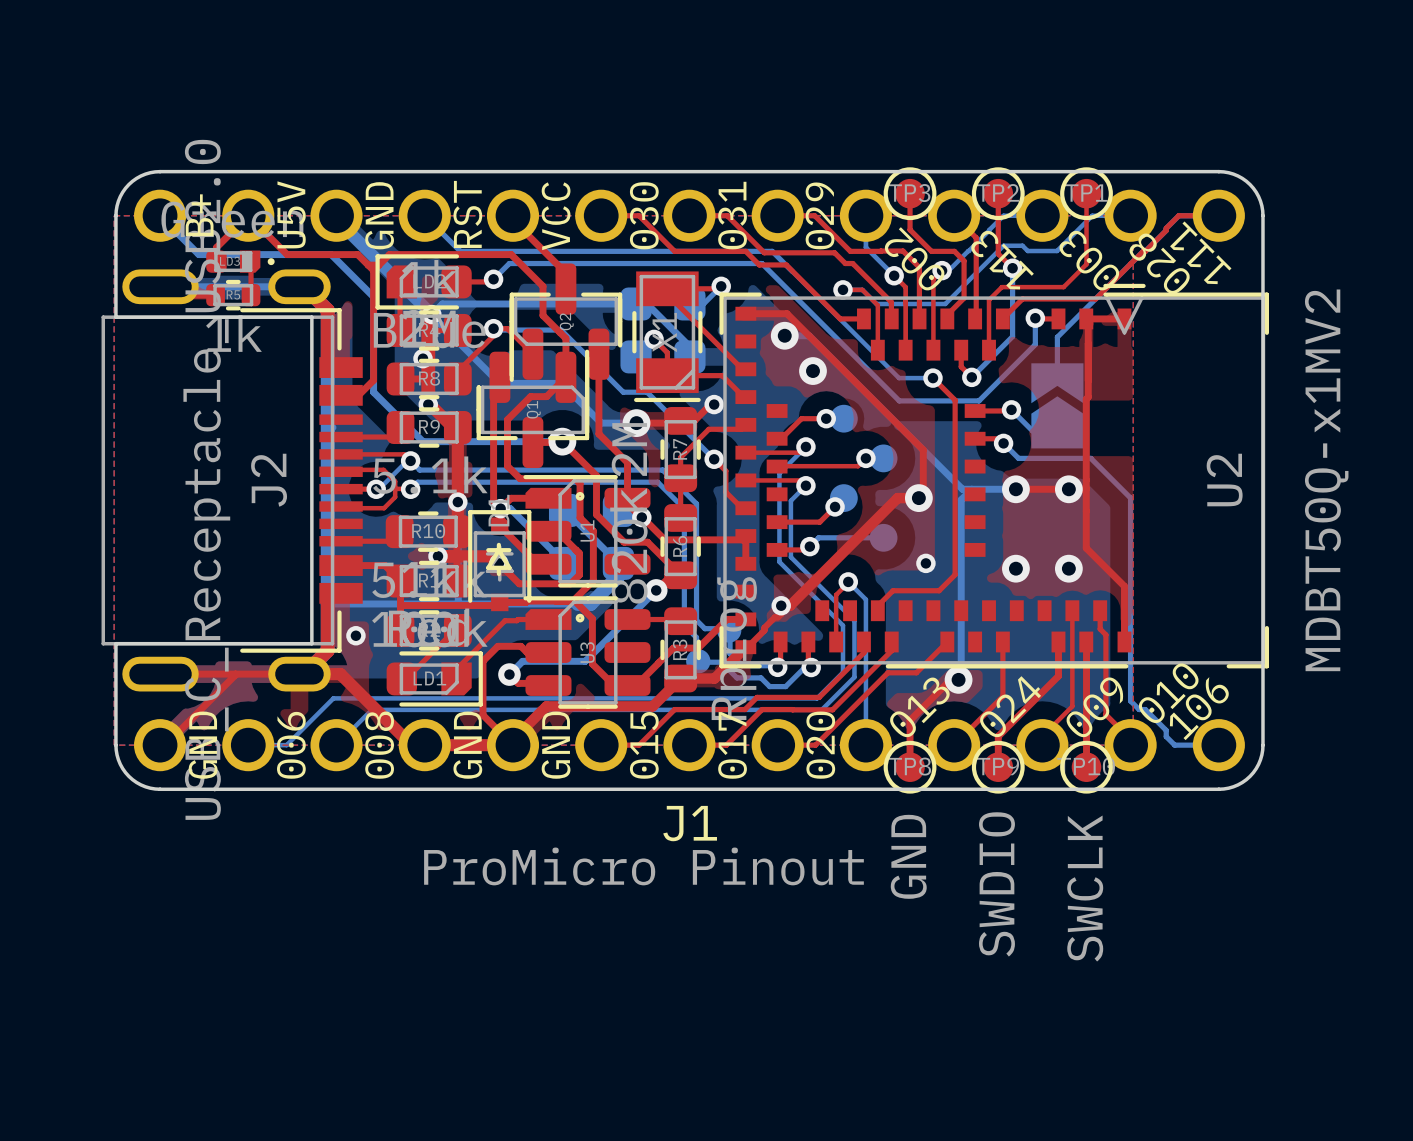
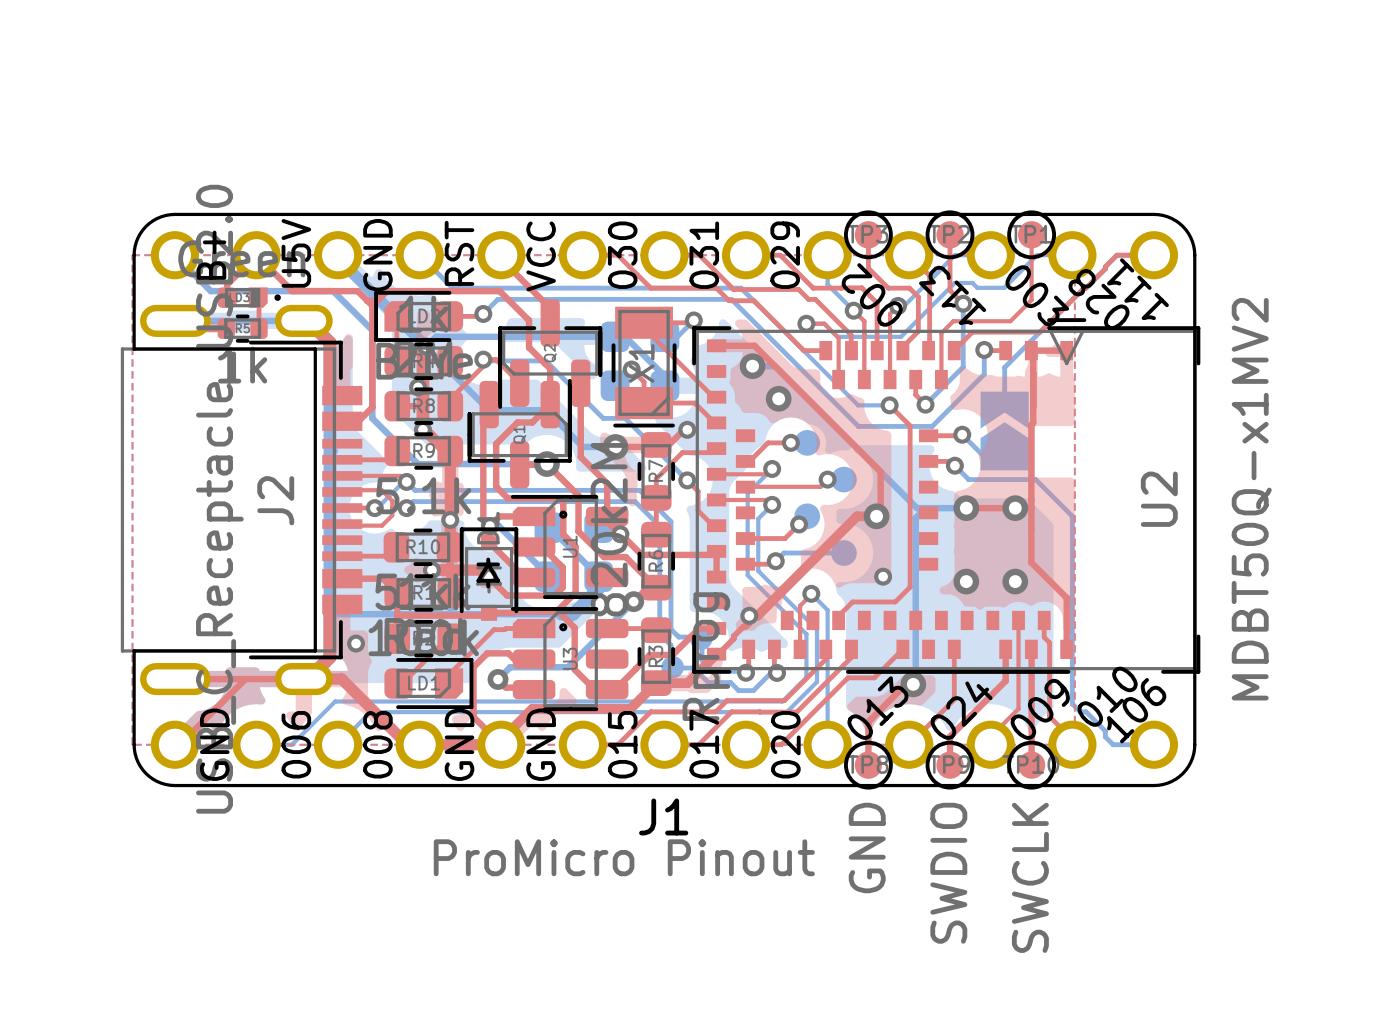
text rotation: 0° (1089, 260) -> 180° (1037, 295)

